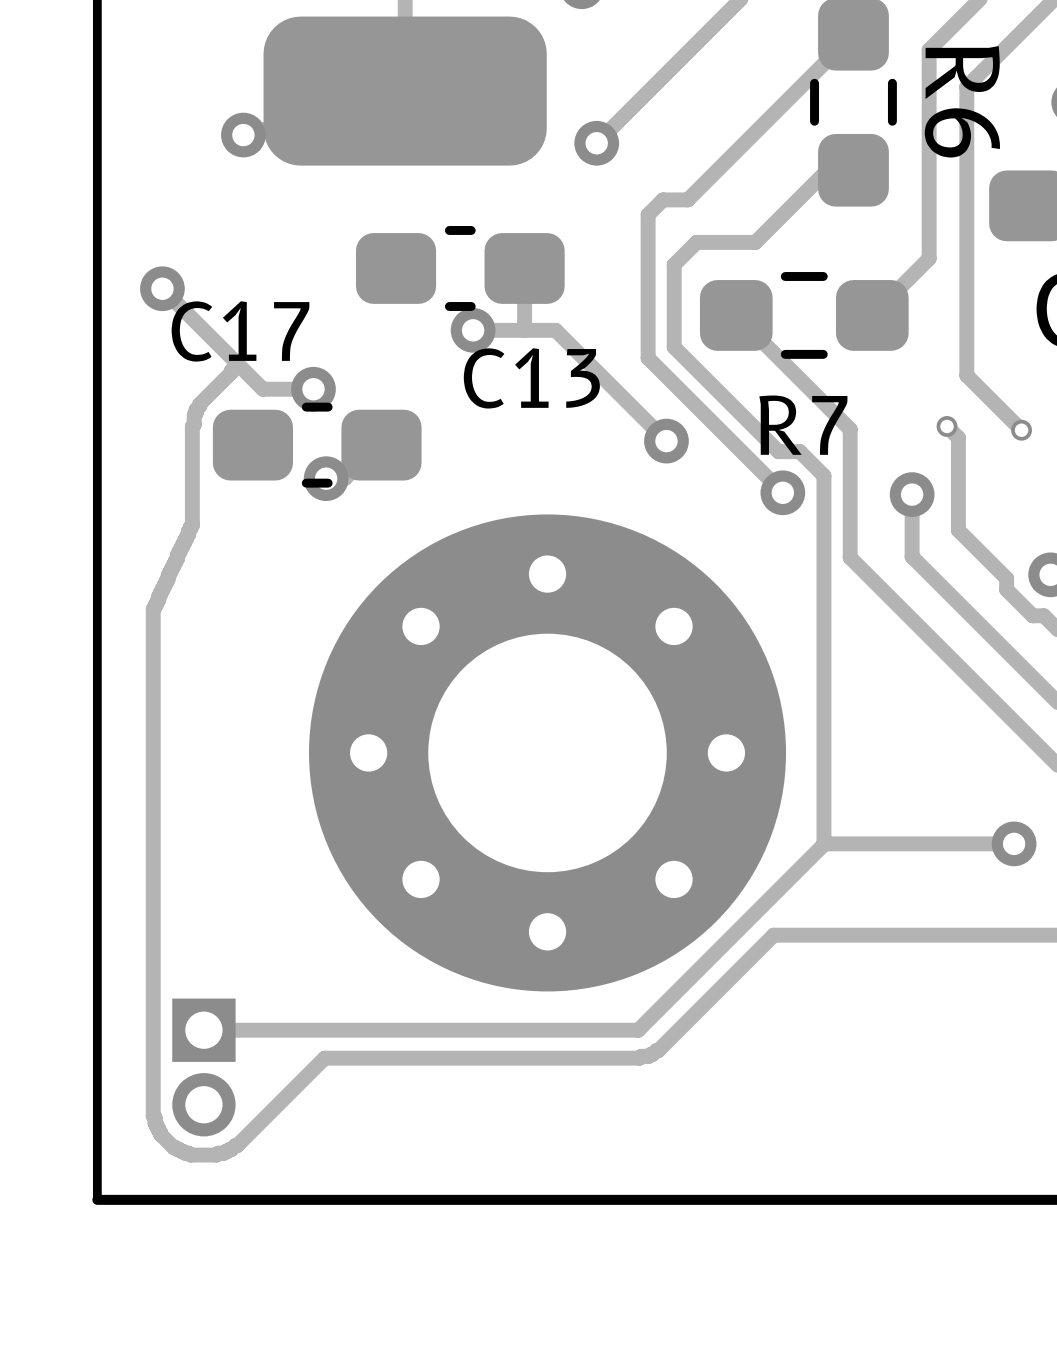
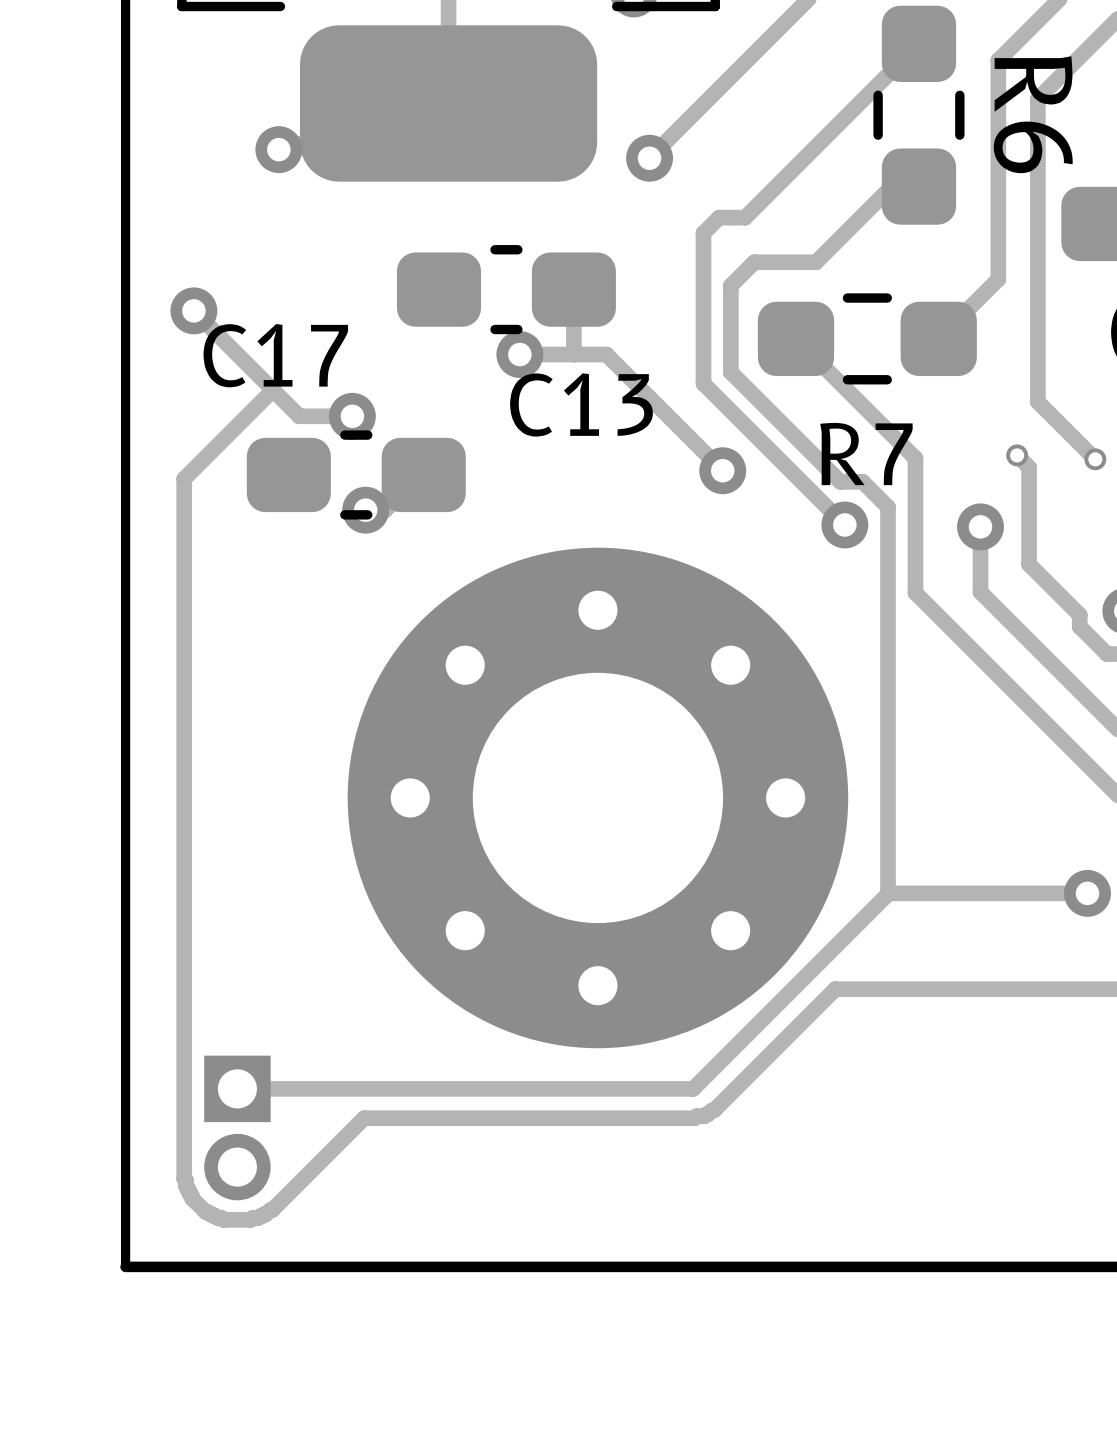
track: (231, 370) (199, 404) (194, 415) (194, 424) (192, 426) (192, 525) (153, 609) -> (266, 396) (184, 478) (184, 647)

